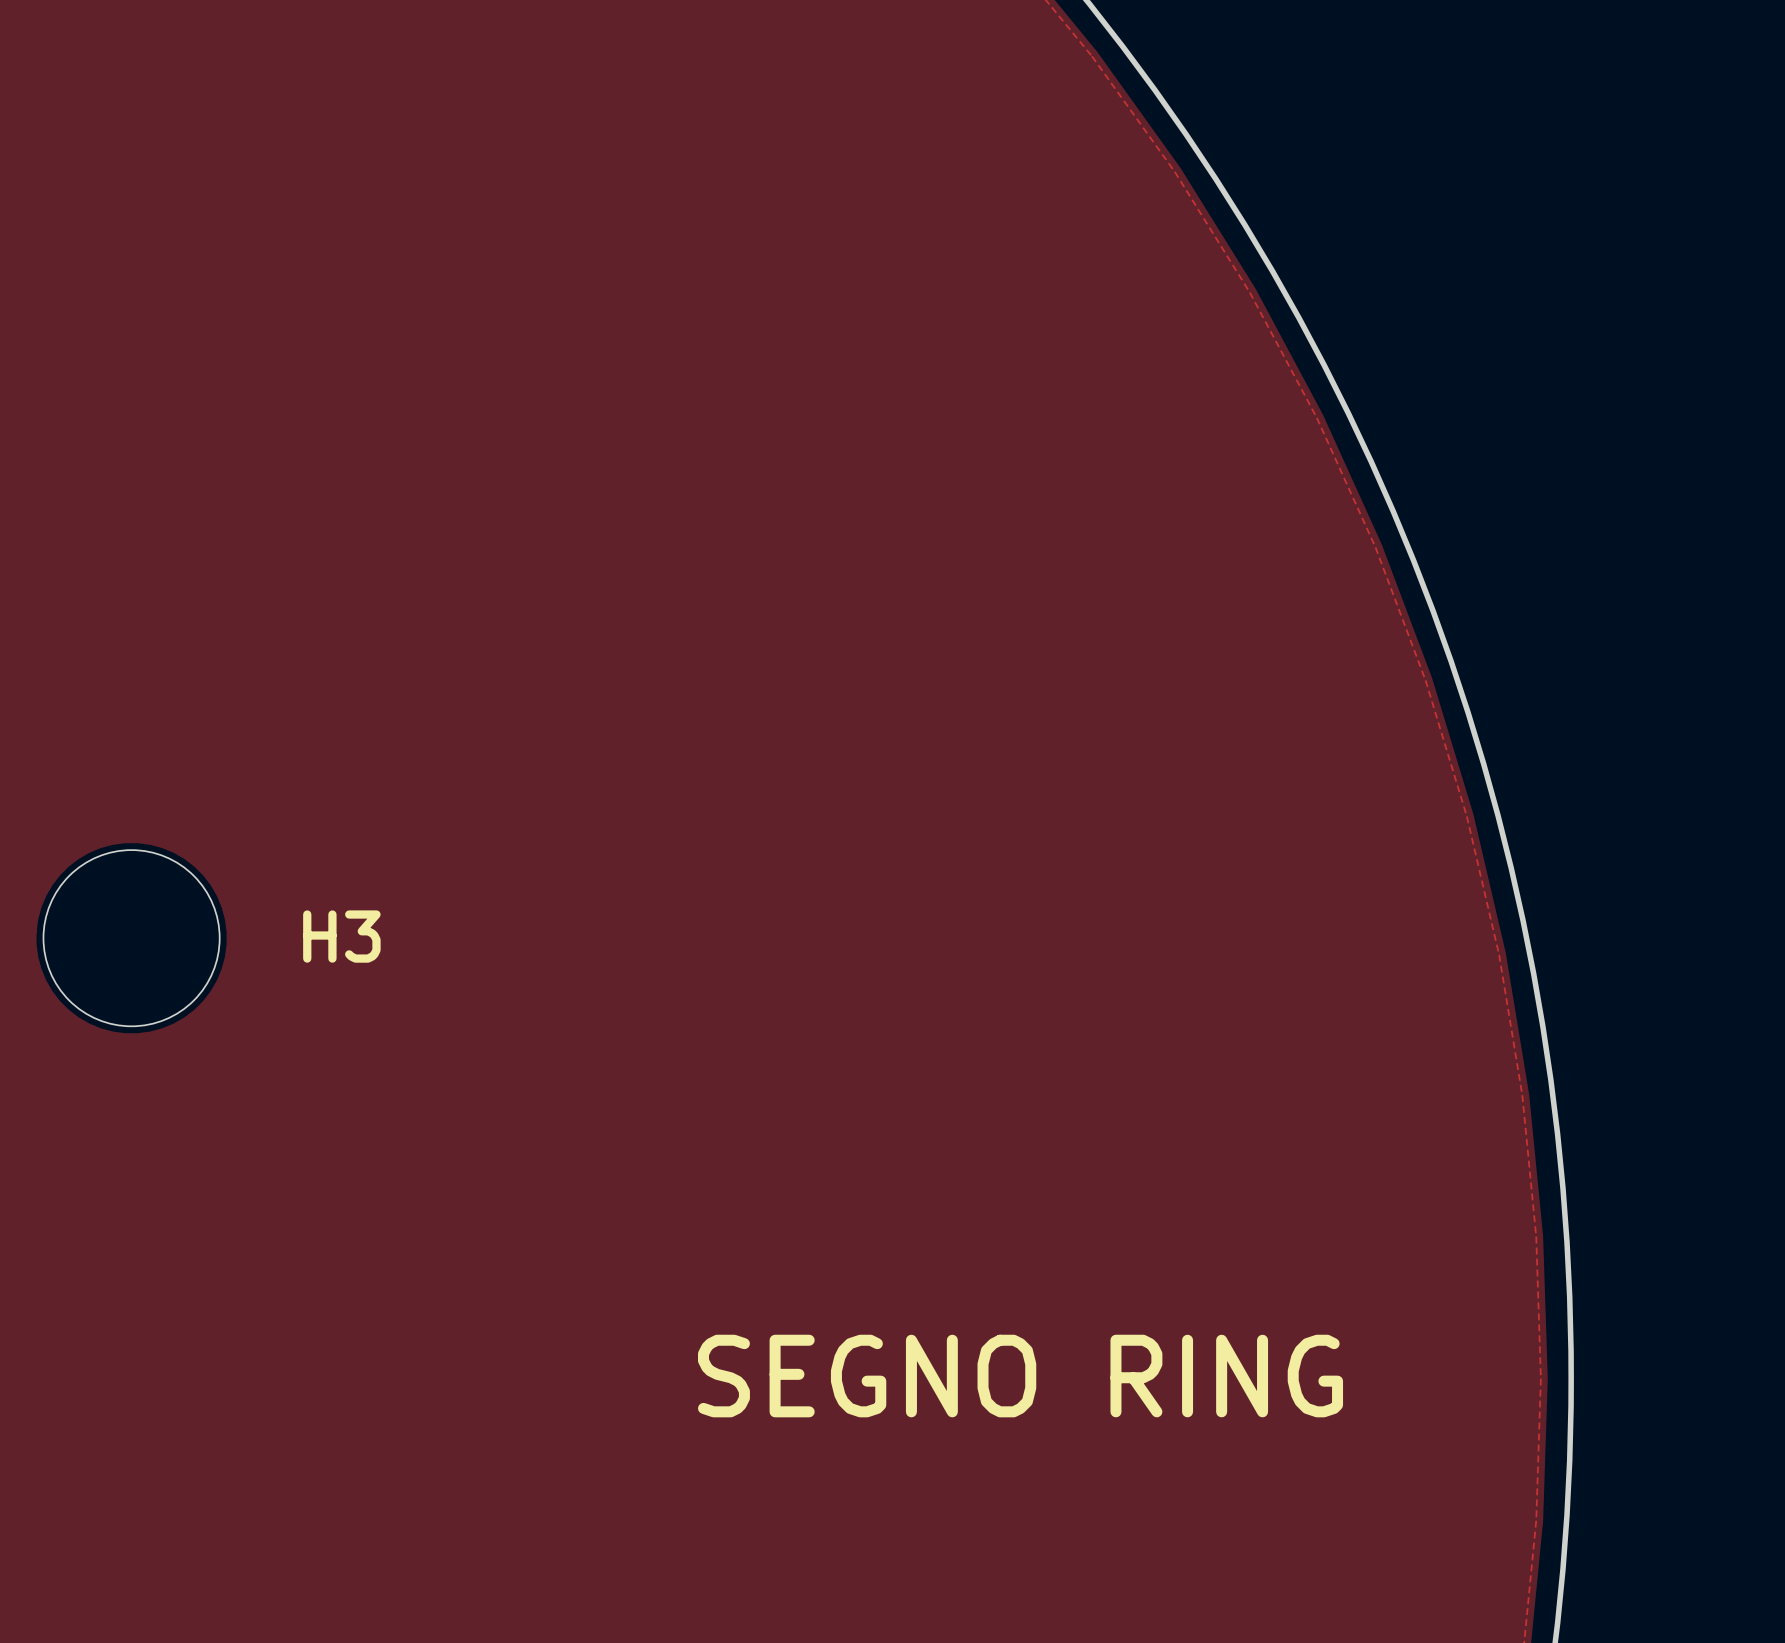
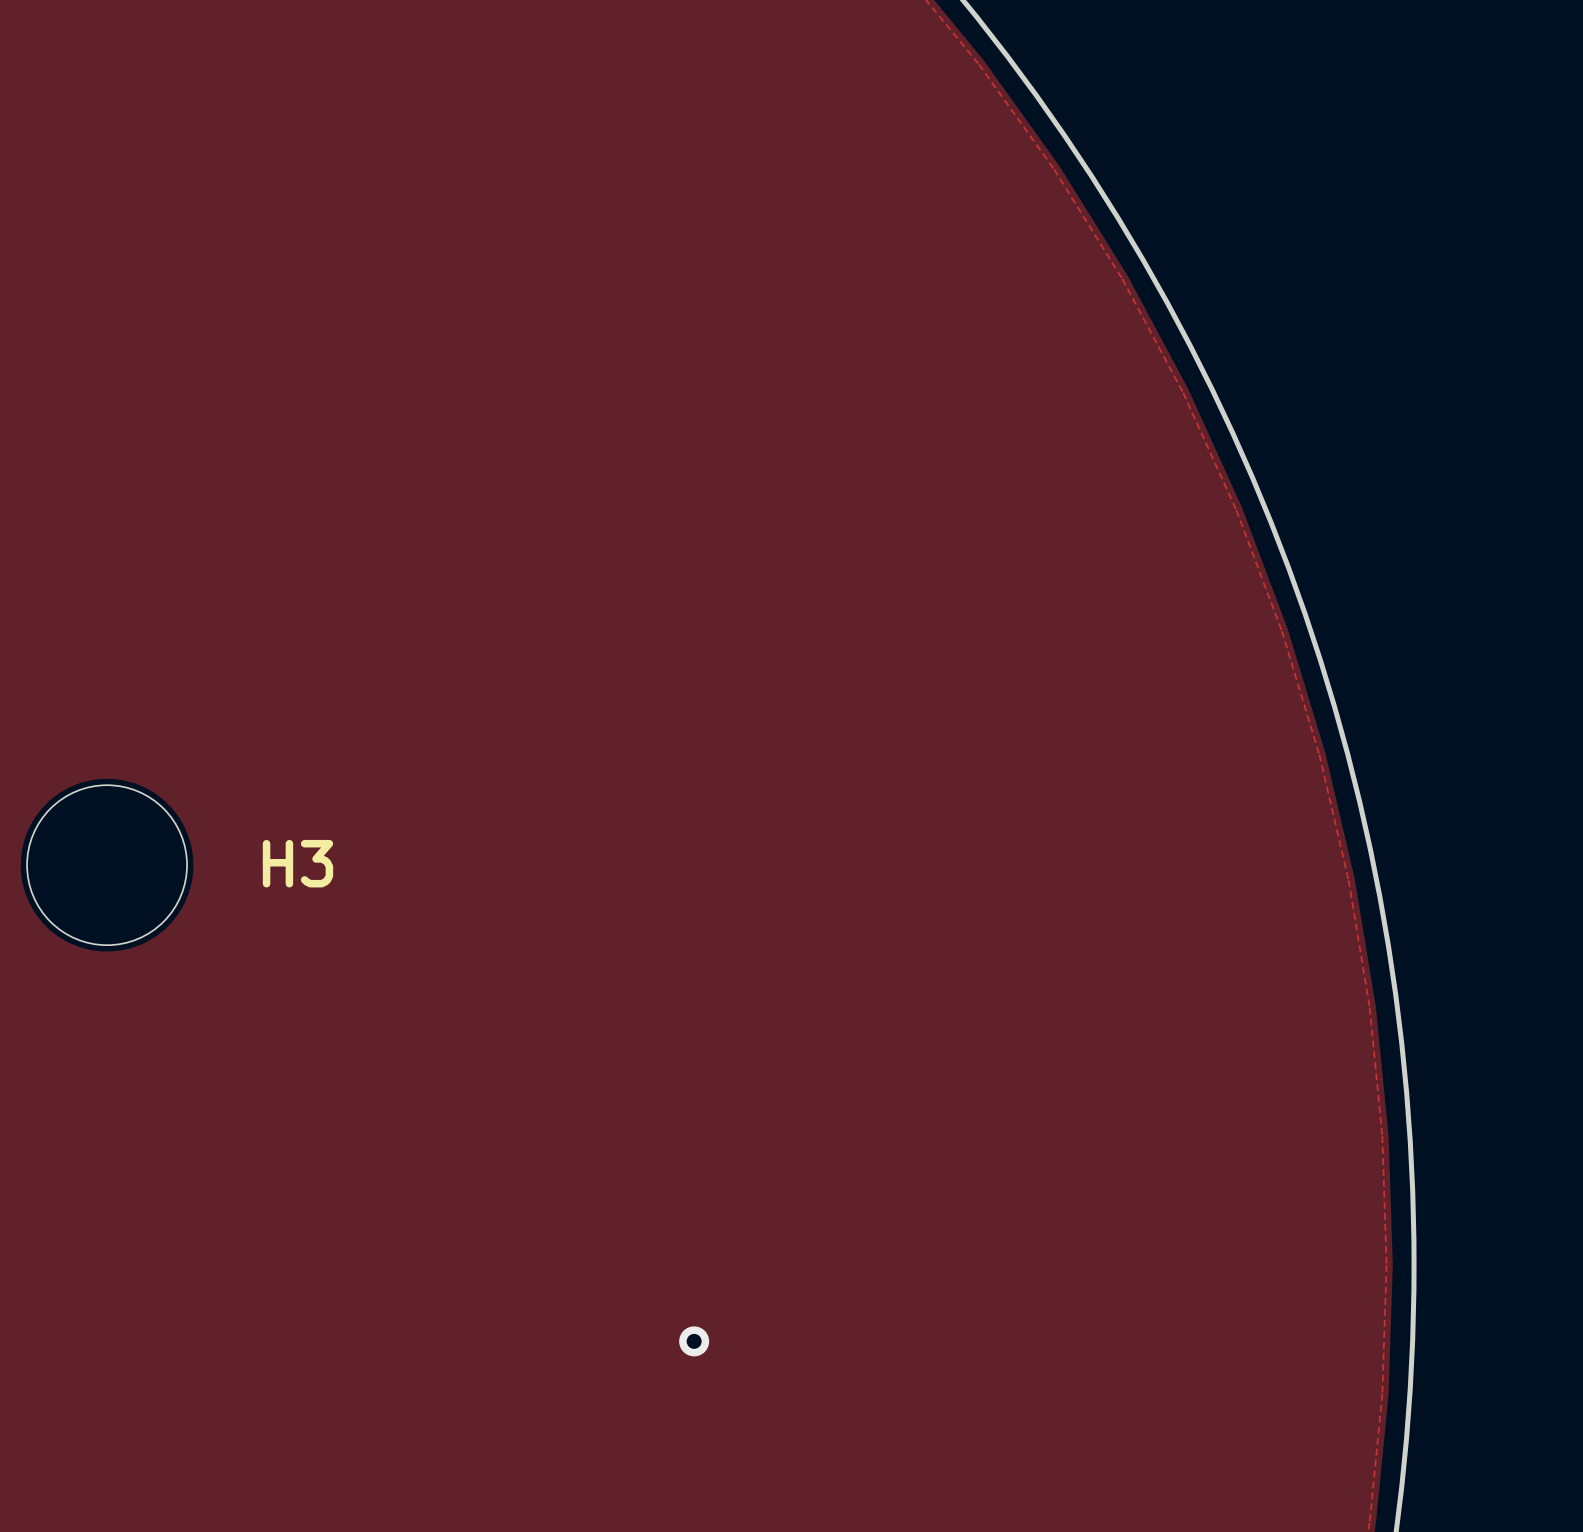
text: SEGNO RING (1020, 1376) -> none
via: none -> (694, 1341)

